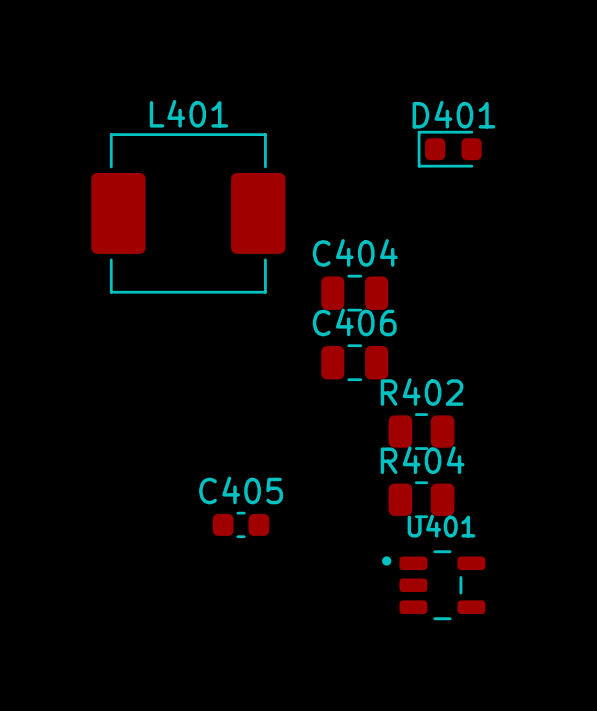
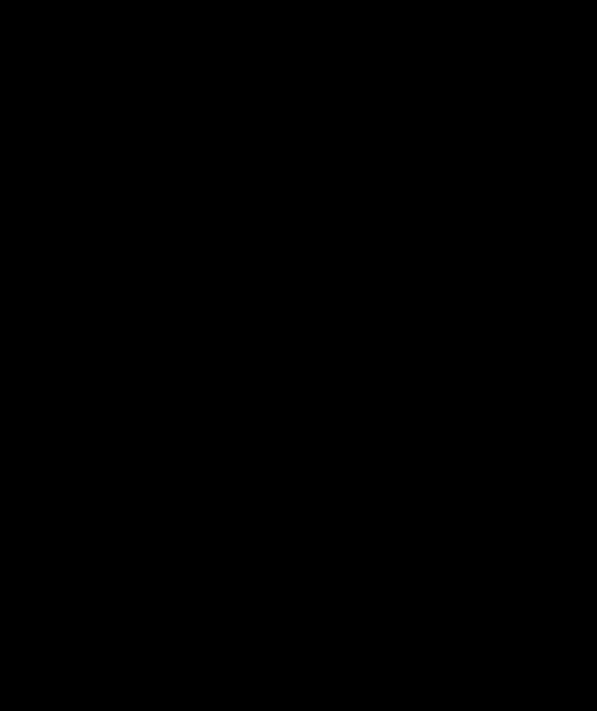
D401: (449, 149) -> none
L401: (188, 213) -> none
C404: (354, 293) -> none
C406: (354, 362) -> none
R402: (421, 431) -> none
R404: (421, 499) -> none
C405: (241, 524) -> none
U401: (433, 585) -> none

